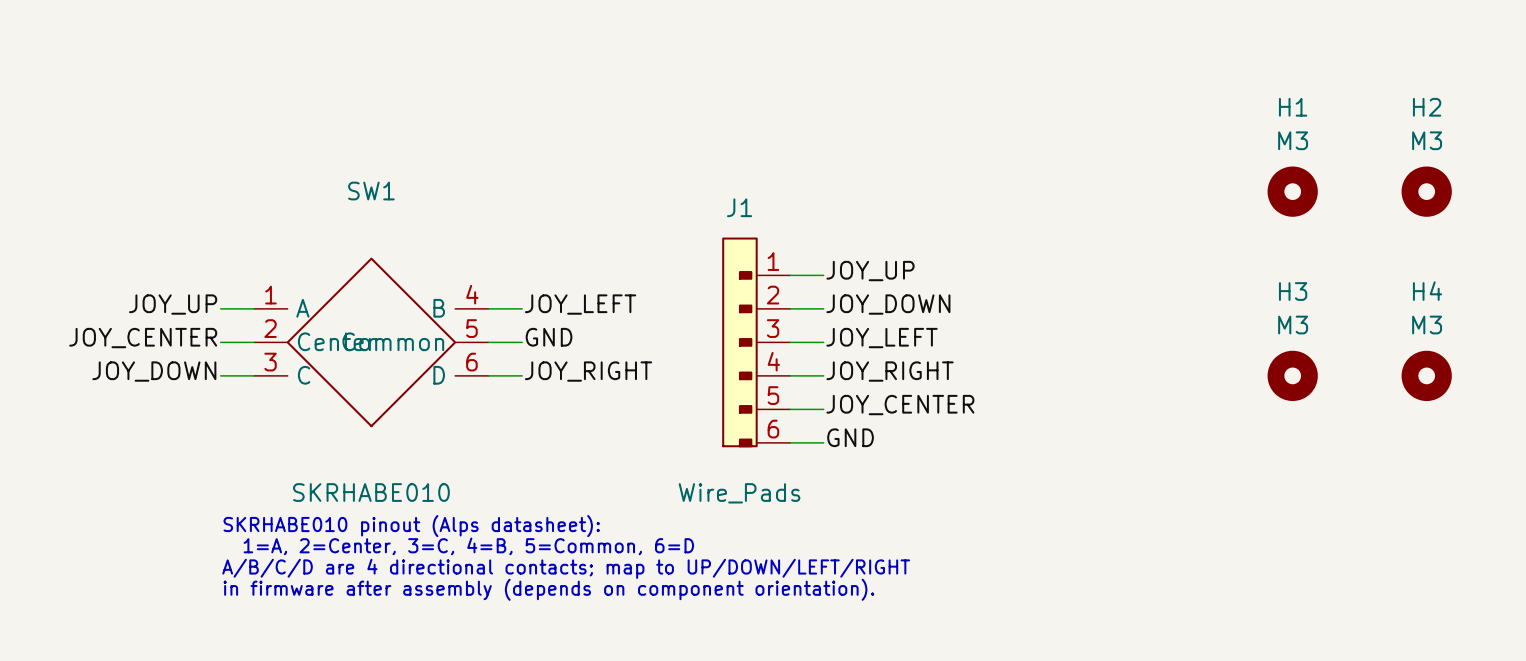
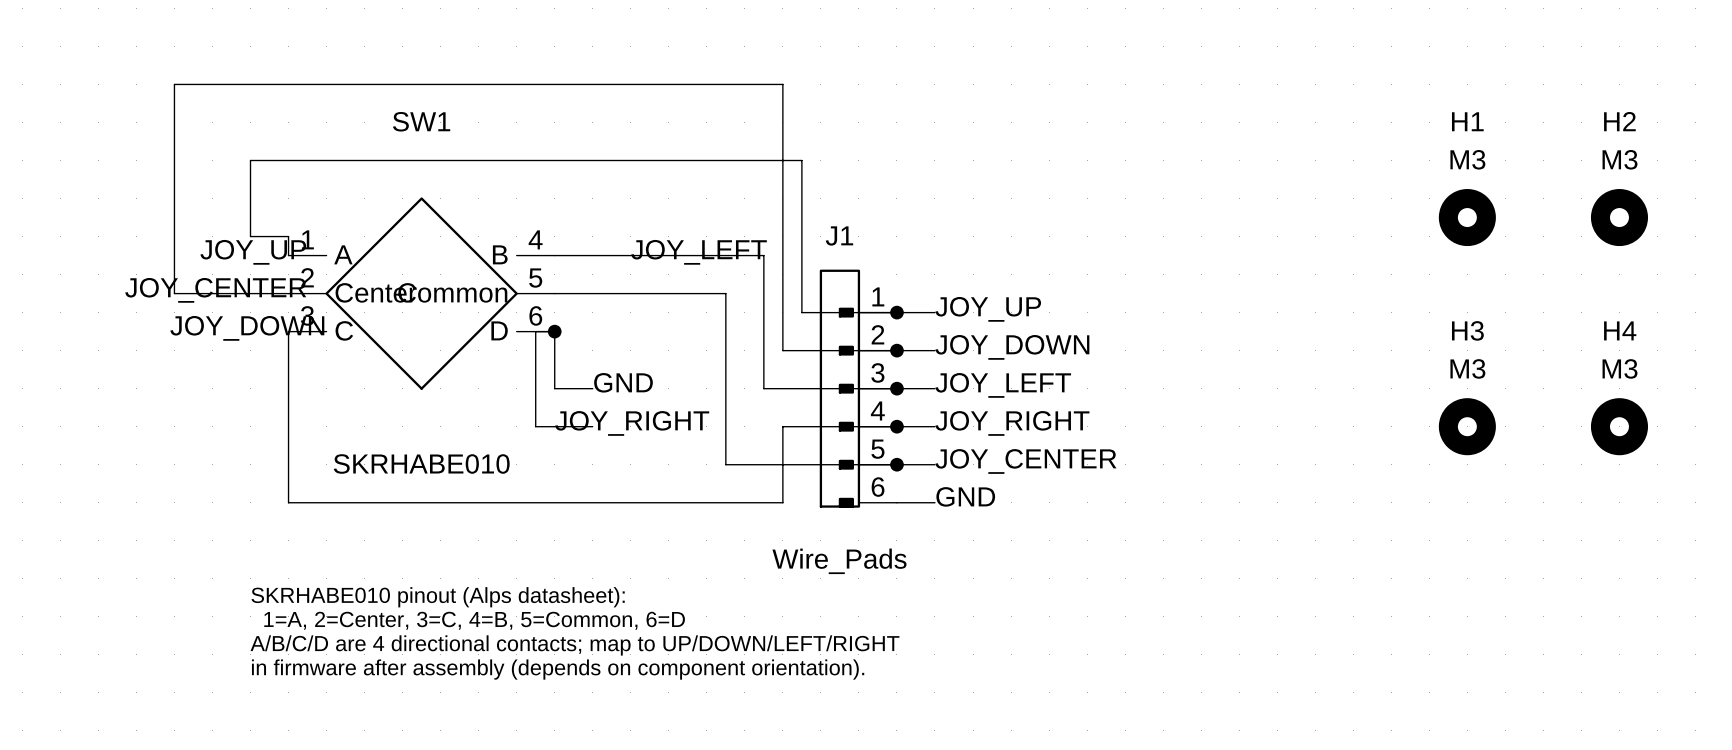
wire: none -> (288, 255) (288, 236) (250, 236) (250, 160) (801, 160) (801, 312) (896, 312)
wire: none -> (554, 255) (763, 255) (763, 388) (896, 388)
wire: none -> (288, 293) (174, 293) (174, 84) (782, 84) (782, 350) (896, 350)
wire: none -> (554, 293) (725, 293) (725, 464) (896, 464)
junction: none -> (896, 312)
wire: none -> (288, 331) (288, 502) (782, 502) (782, 426) (896, 426)
junction: none -> (554, 331)
label position: JOY_UP (173, 304) -> JOY_UP (253, 252)
label position: JOY_LEFT (580, 304) -> JOY_LEFT (699, 252)
wire: (220, 308) (254, 308) -> none
wire: (488, 308) (522, 308) -> none
junction: none -> (896, 350)
label position: JOY_CENTER (143, 338) -> JOY_CENTER (215, 290)
wire: (220, 342) (254, 342) -> none
SW1 position: (371, 342) -> (421, 293)
wire: none -> (554, 388) (554, 331) (535, 331) (535, 426) (554, 426)
junction: none -> (896, 388)
label position: JOY_DOWN (154, 371) -> JOY_DOWN (247, 328)
label position: JOY_RIGHT (588, 371) -> JOY_RIGHT (632, 423)
wire: (220, 375) (254, 375) -> none
junction: none -> (896, 426)
junction: none -> (896, 464)

